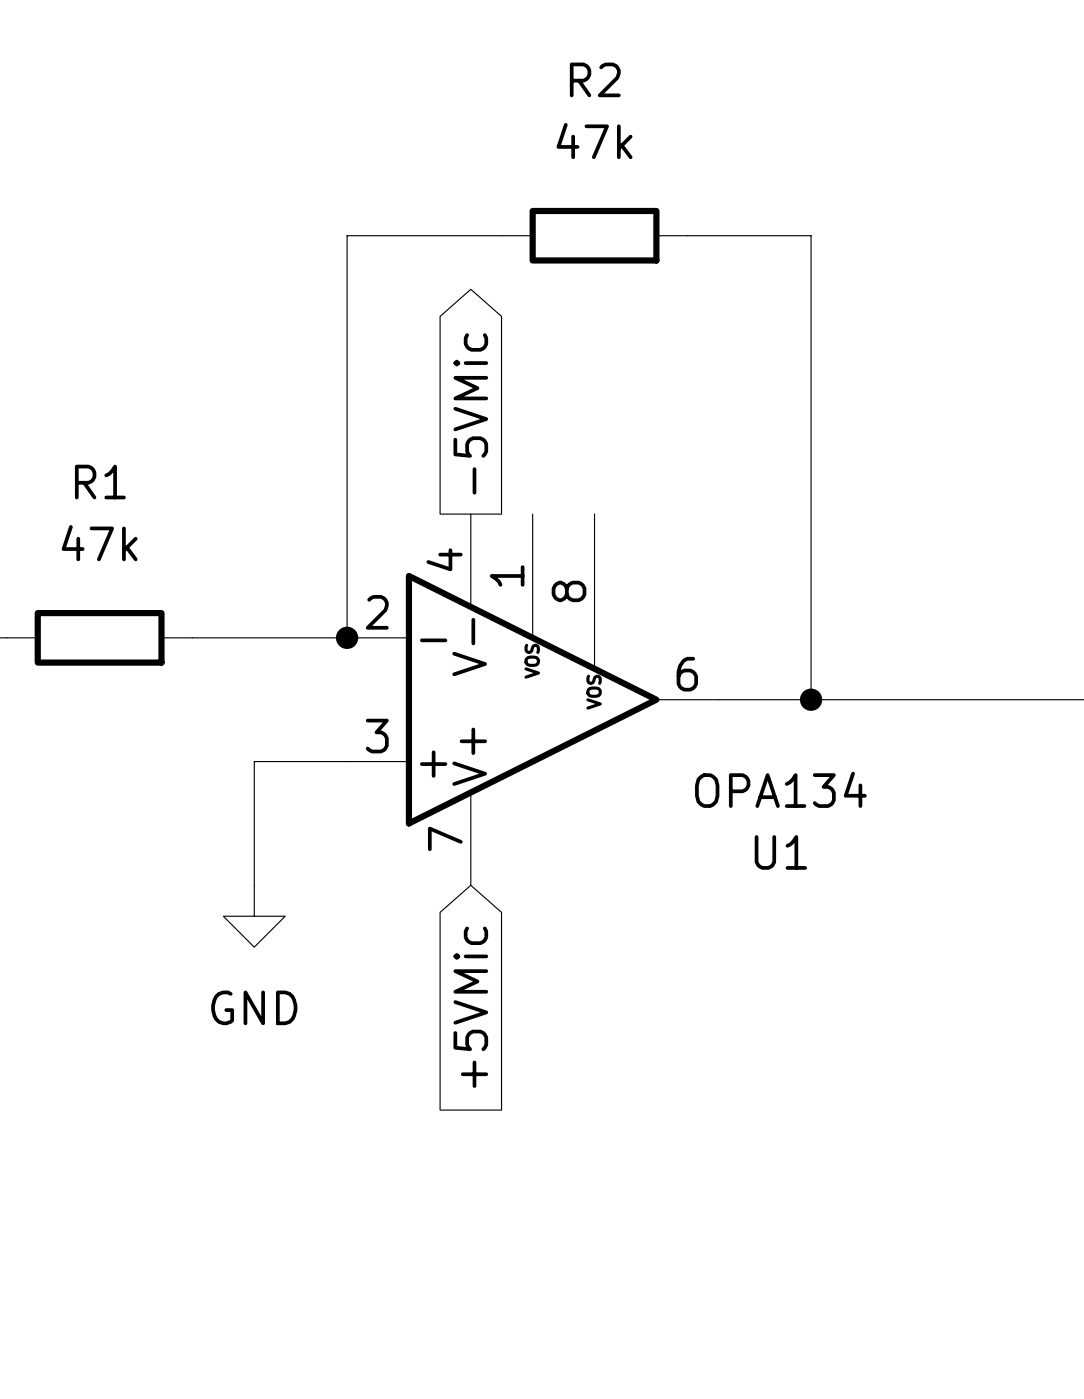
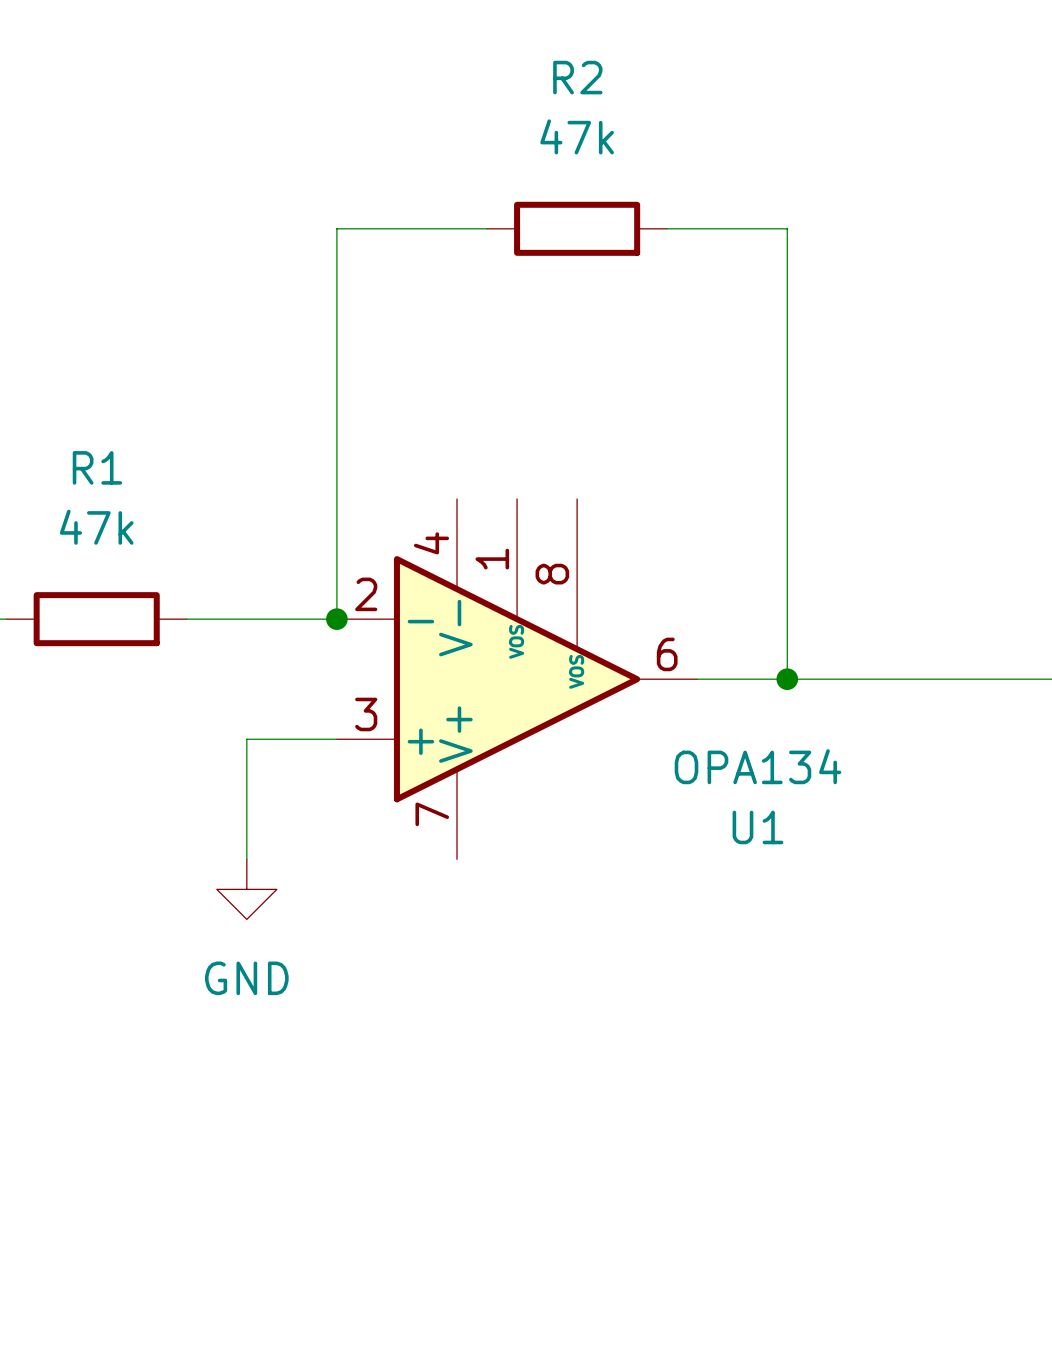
global label: -5VMic (470, 413) -> none
global label: +5VMic (470, 1007) -> none

